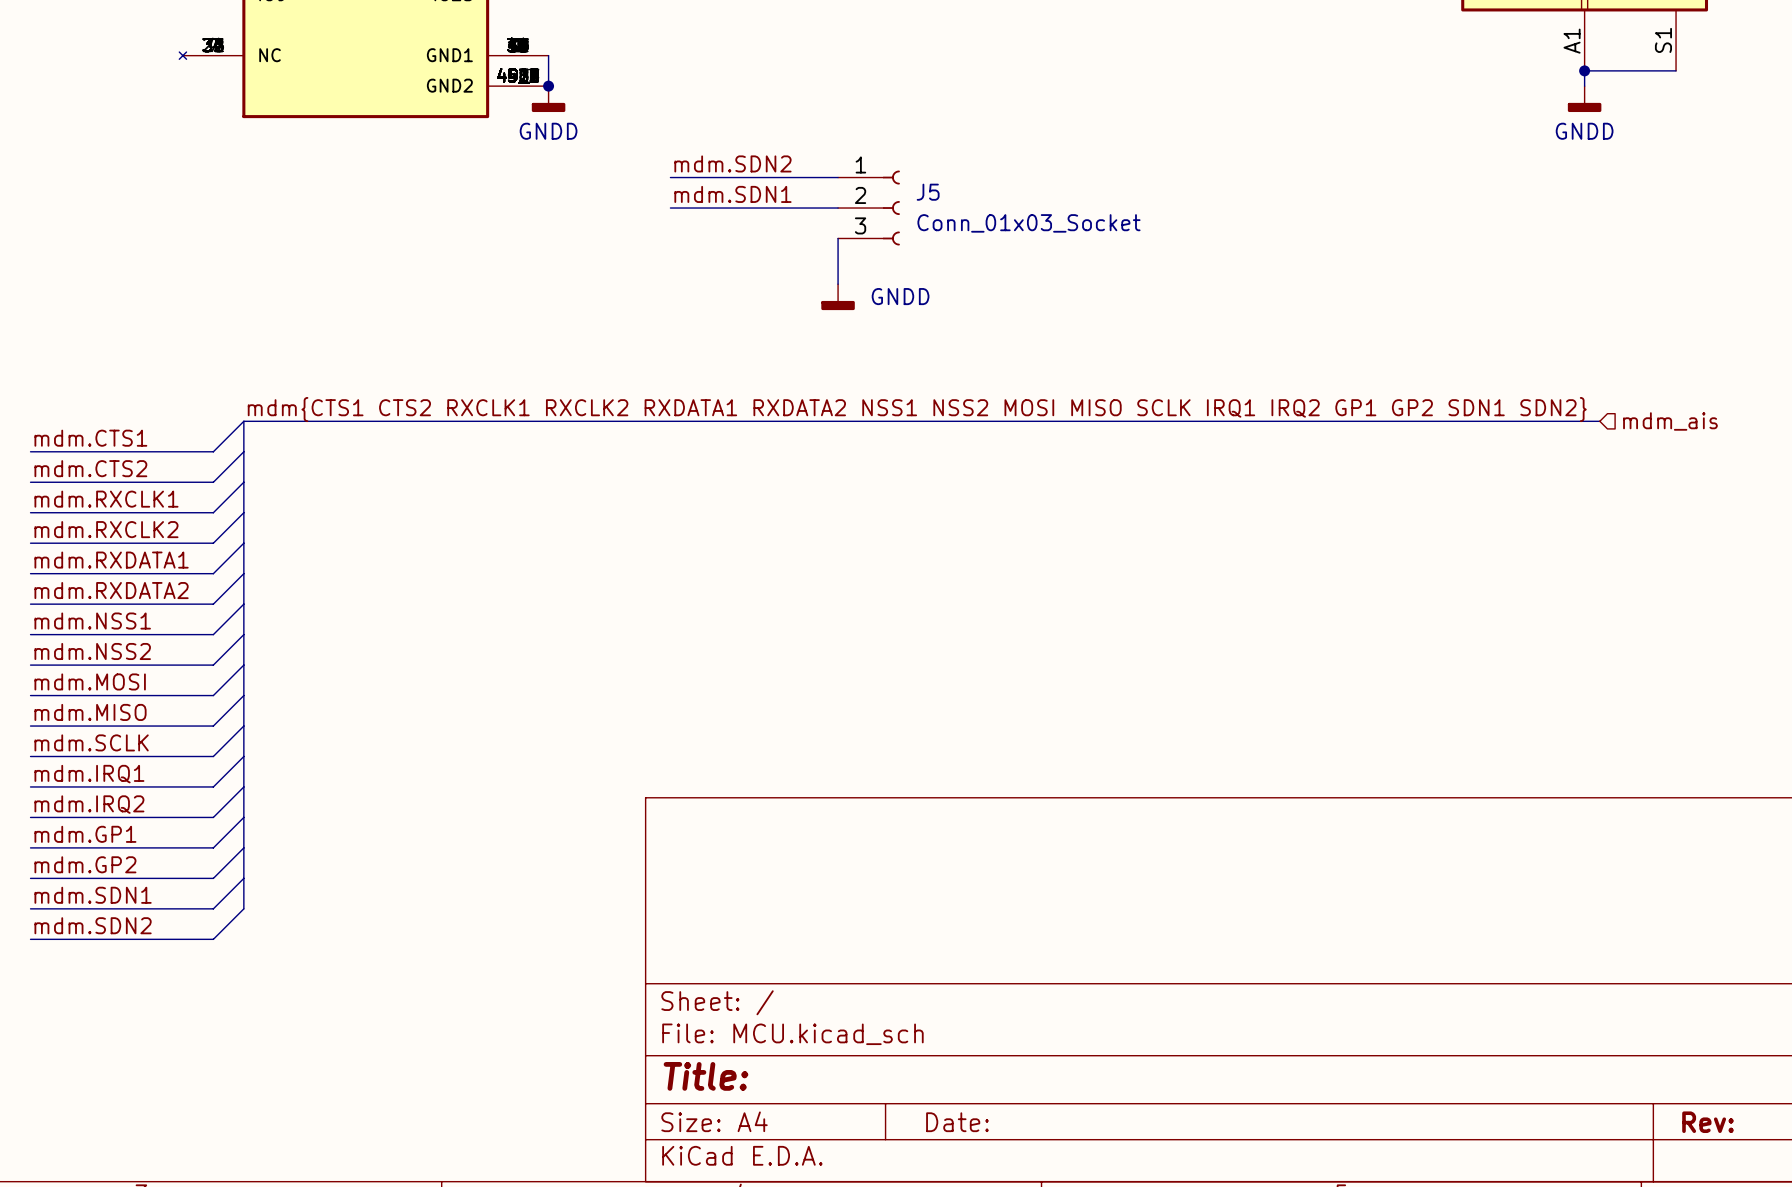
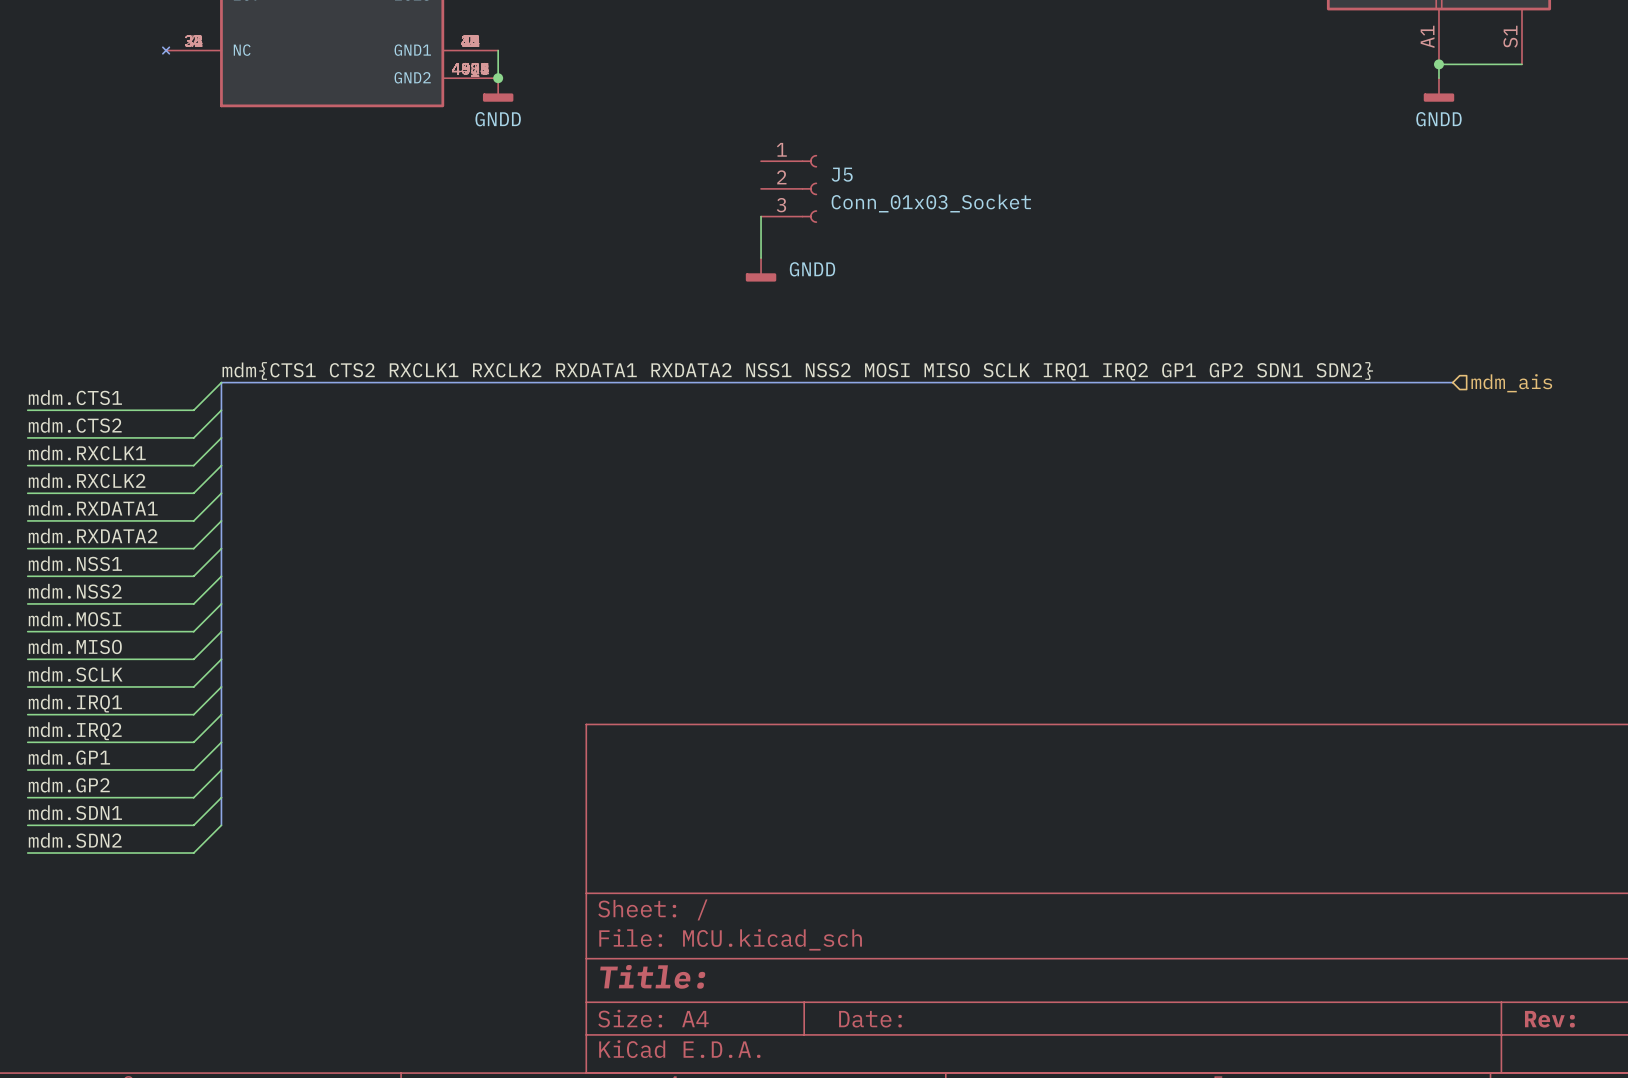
label: mdm.SDN2 (732, 163) -> none
wire: (670, 177) (838, 177) -> none
label: mdm.SDN1 (732, 194) -> none
wire: (670, 208) (838, 208) -> none

